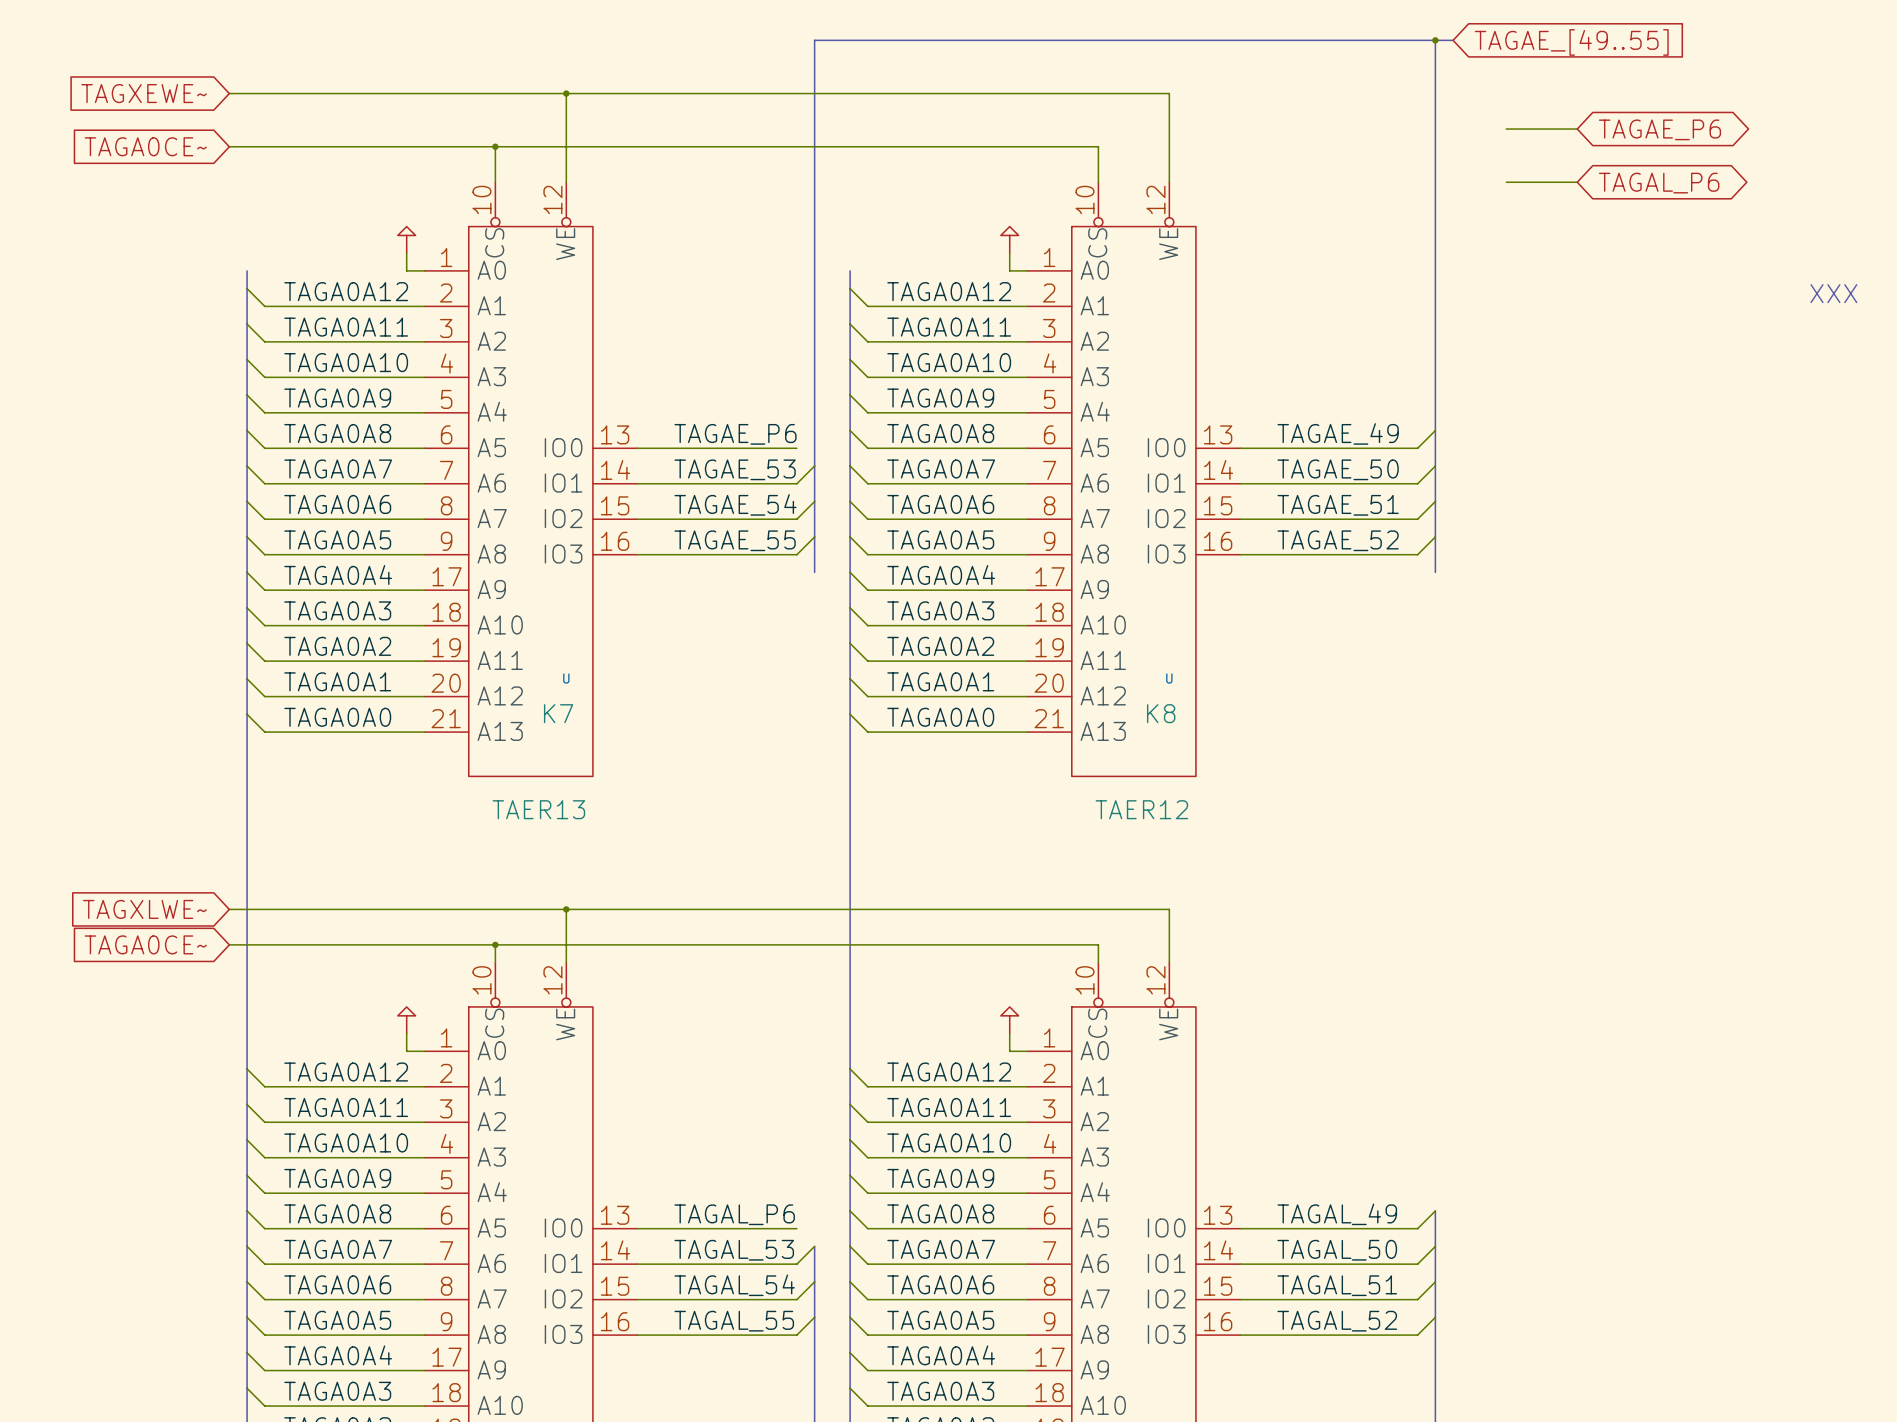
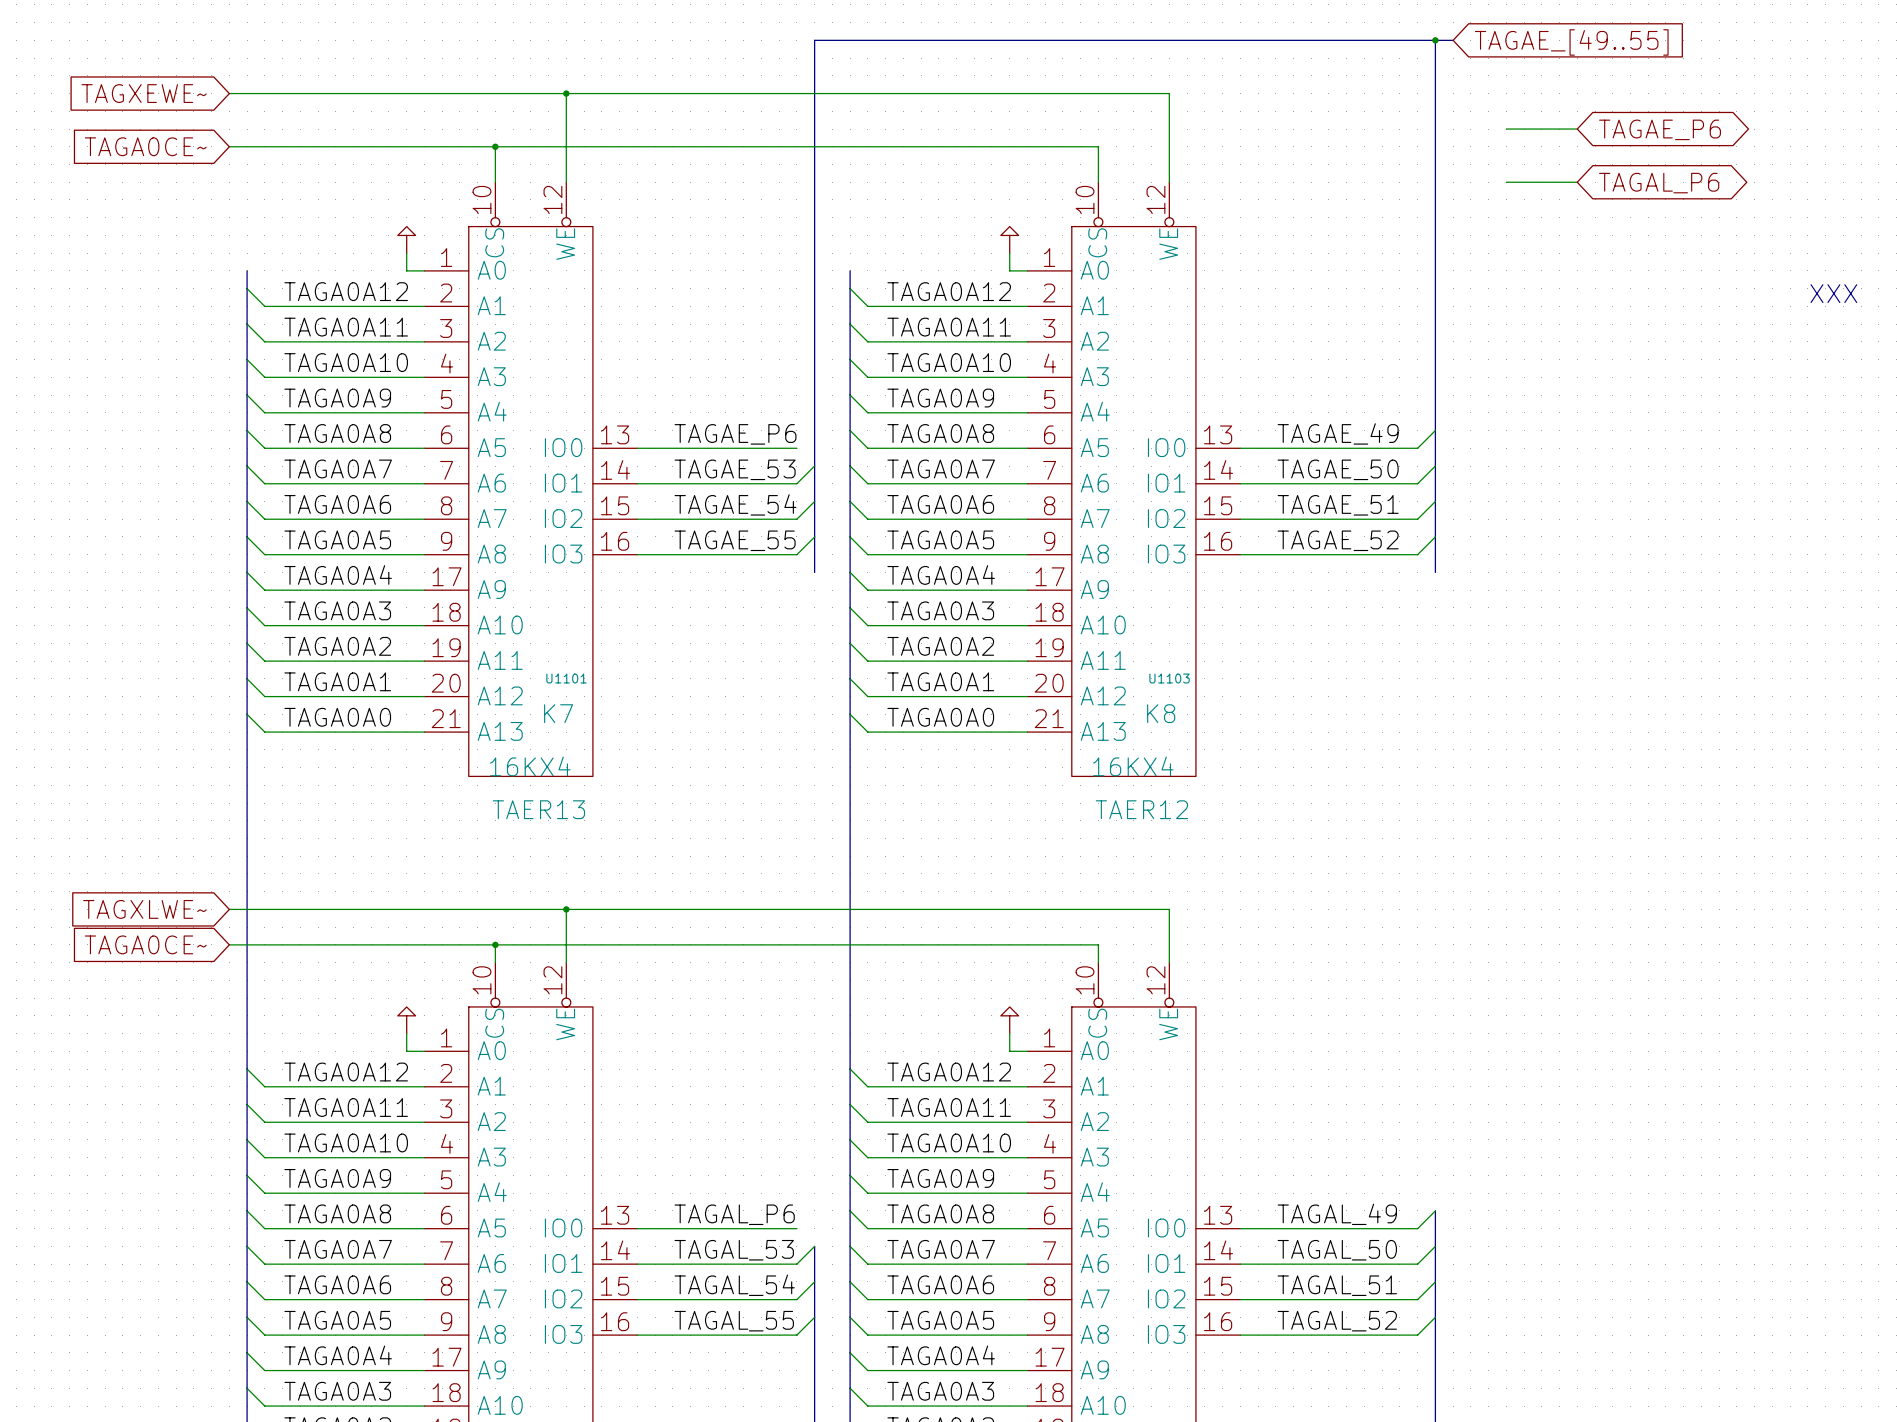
U name: U (566, 678) -> U1101 (566, 678)
U name: U (1169, 678) -> U1103 (1169, 678)
U value: none -> 16KX4 (530, 766)
U value: none -> 16KX4 (1133, 766)

